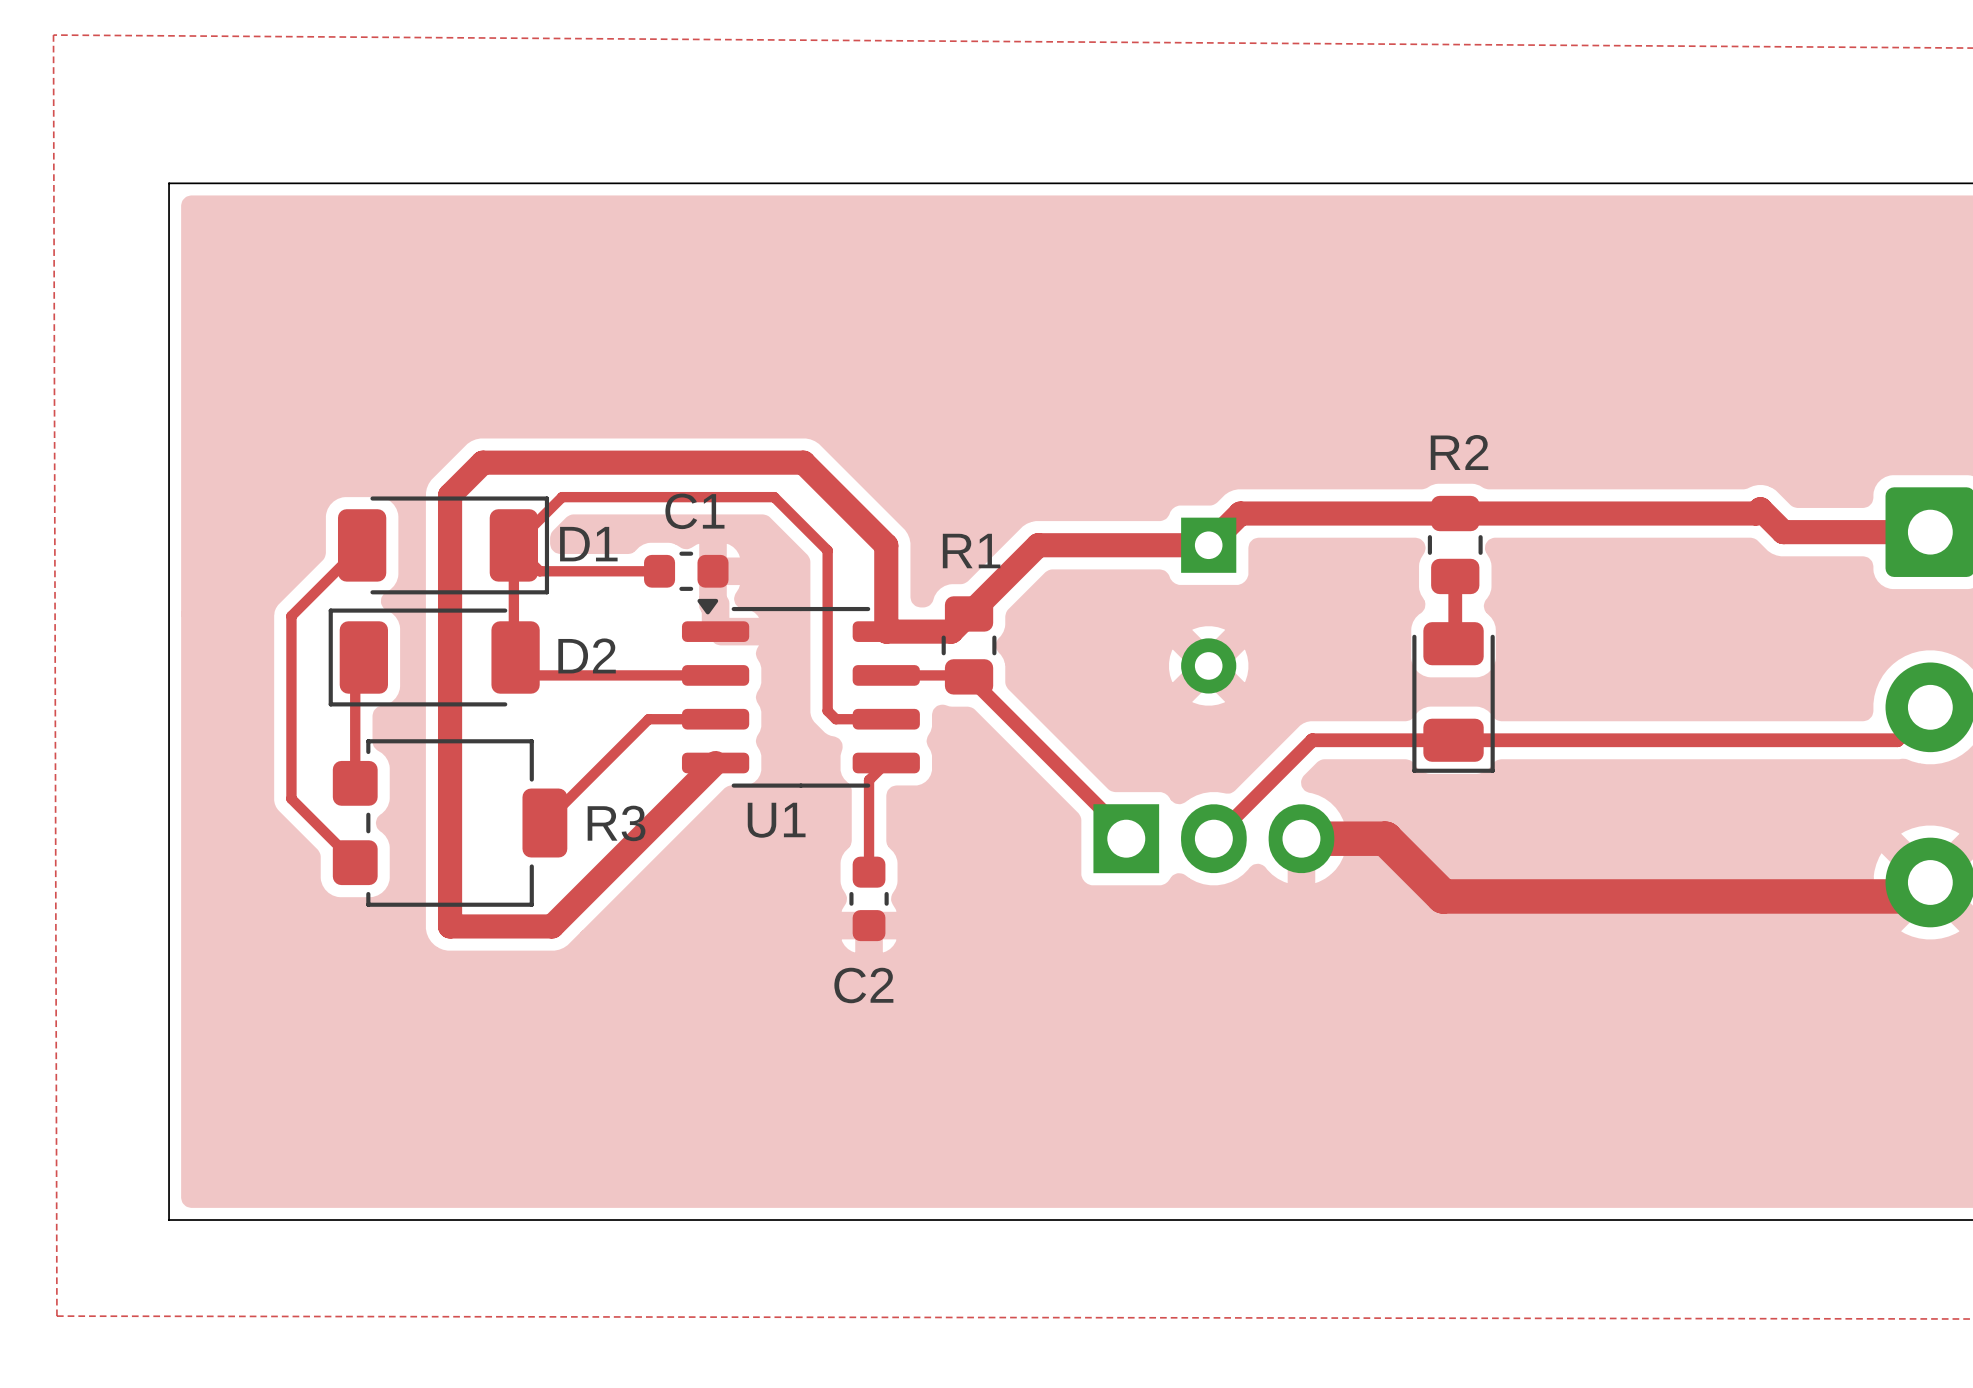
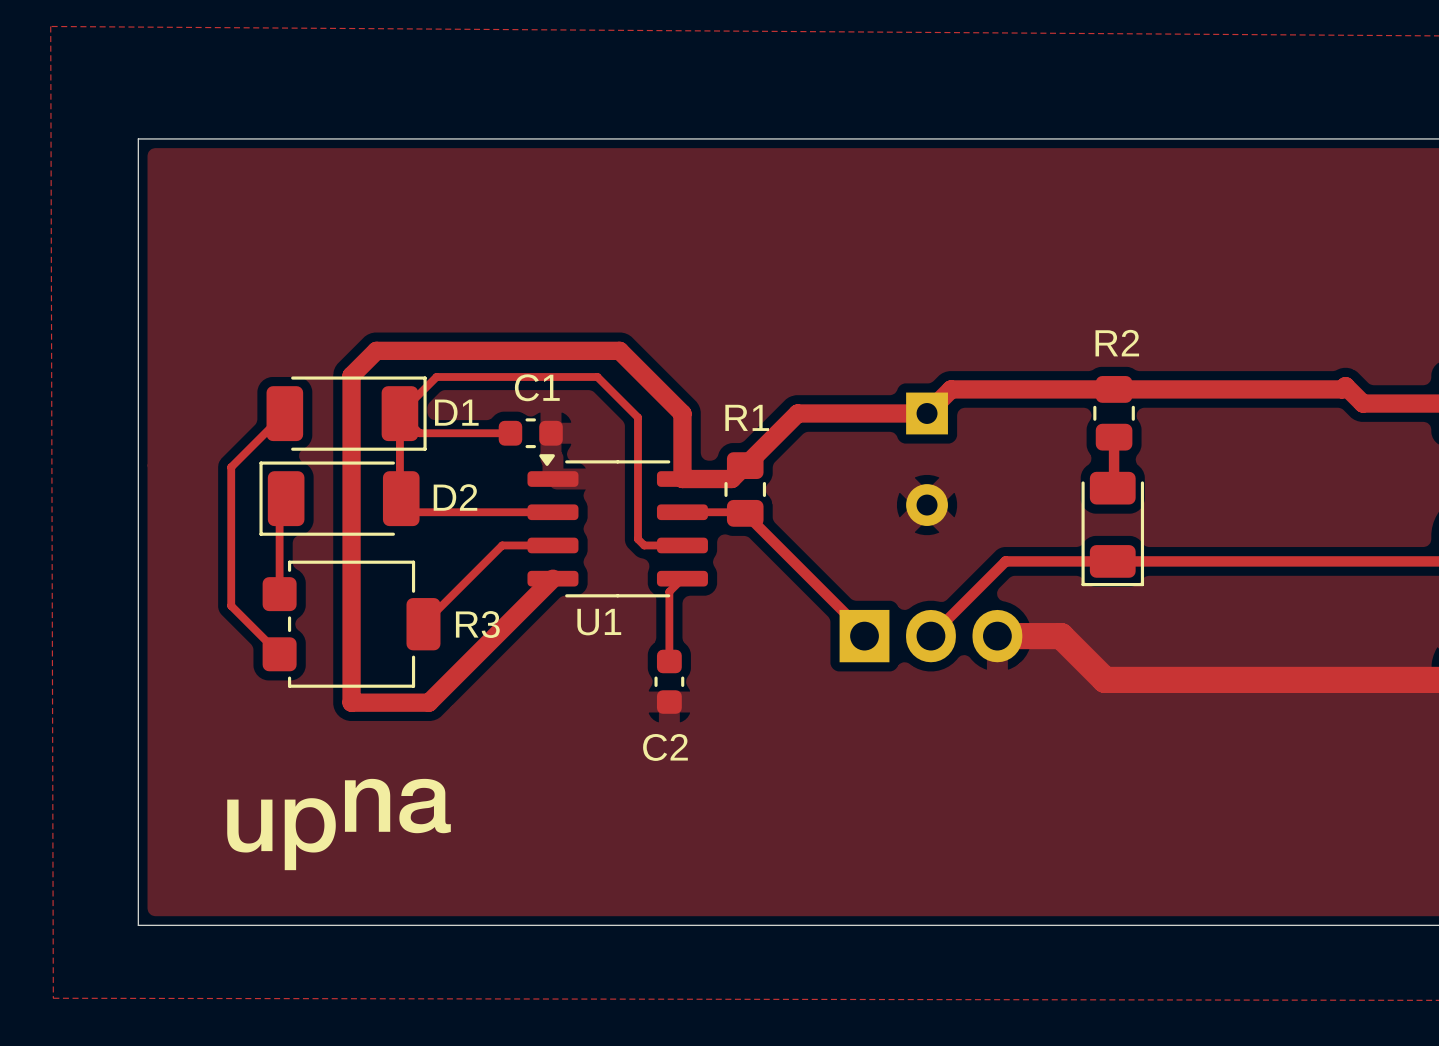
drawing: none -> [227, 778, 451, 871]

